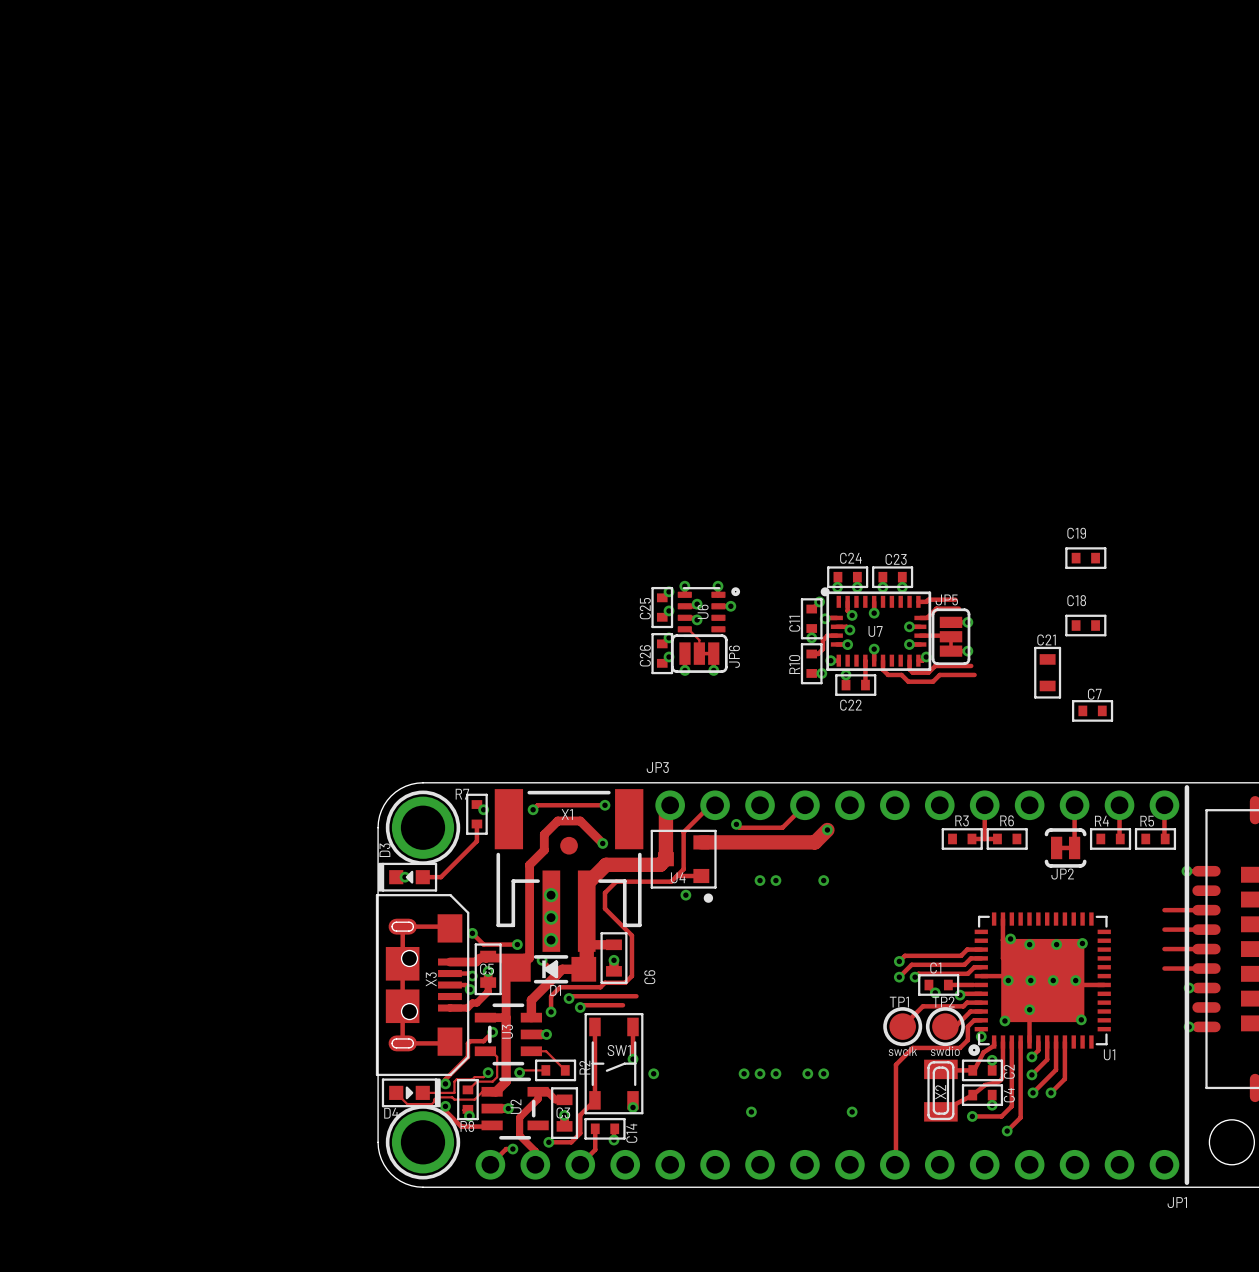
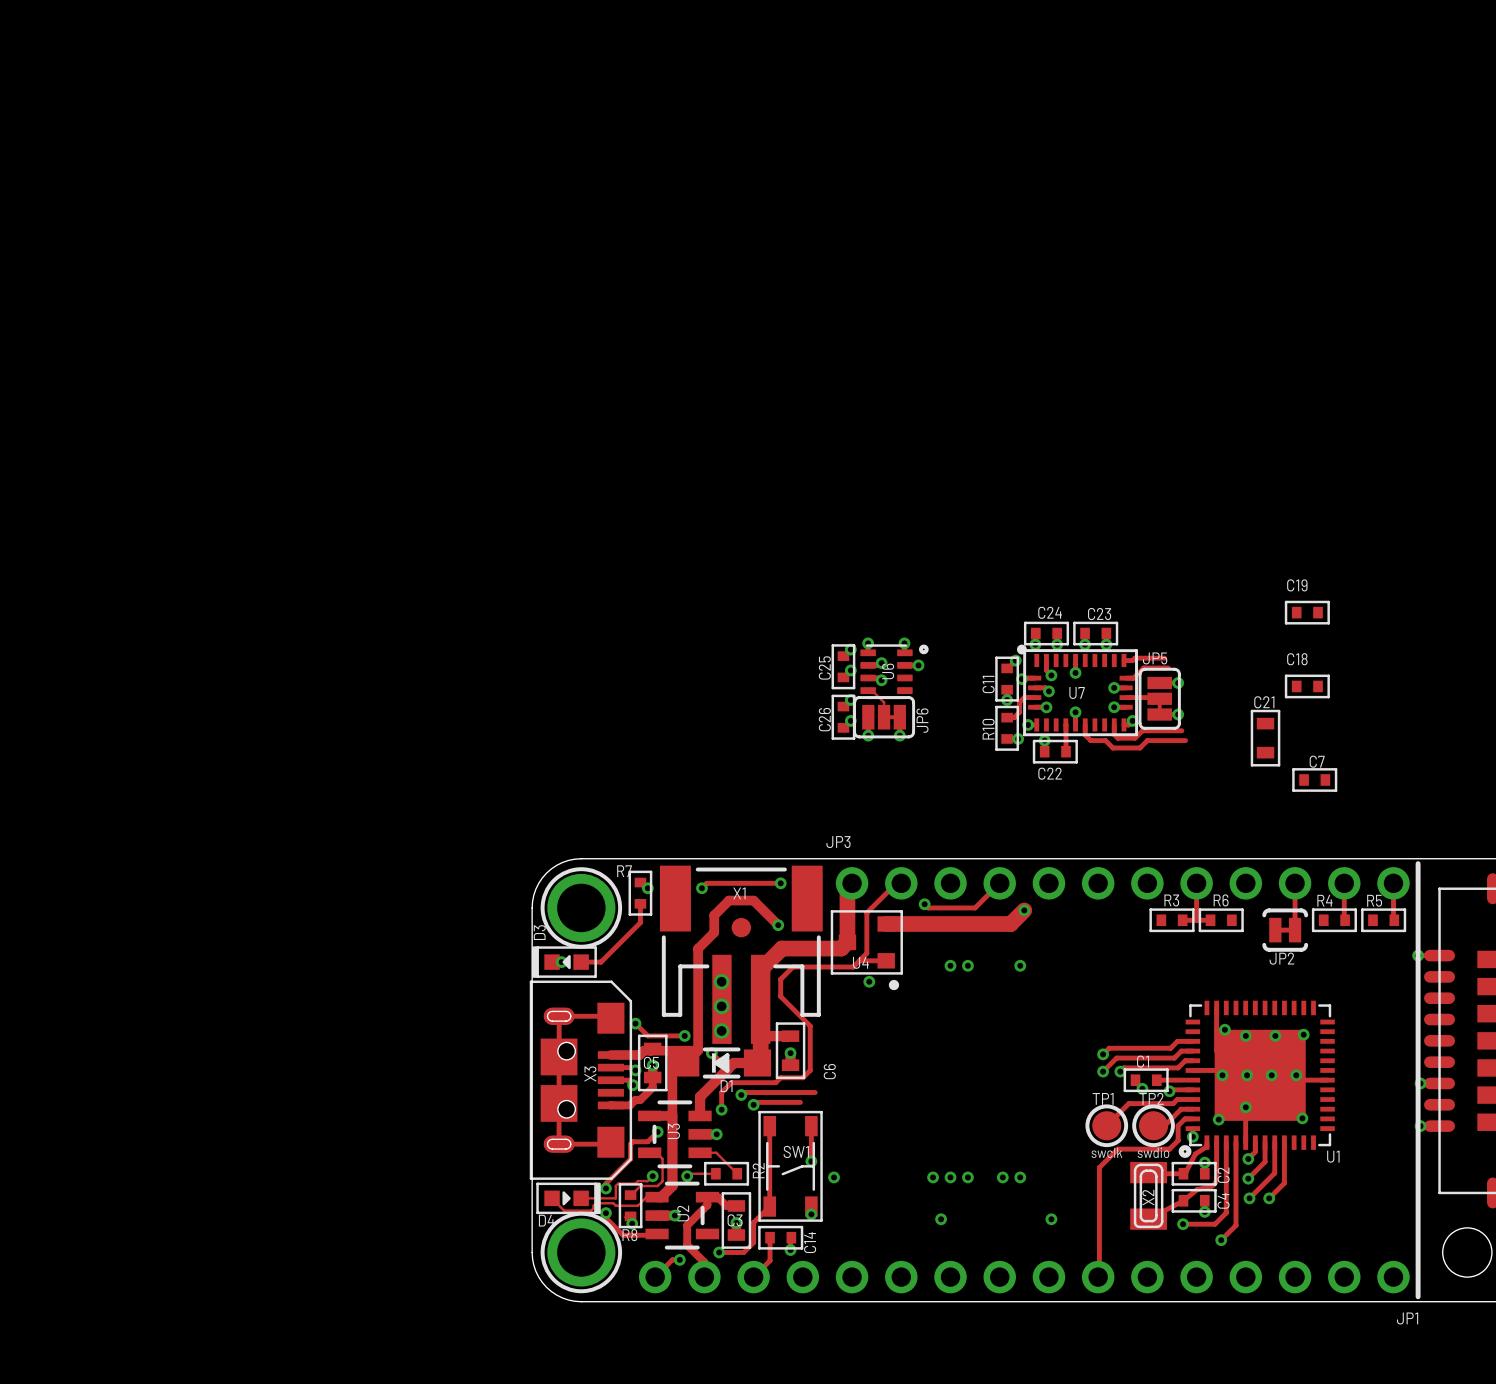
track: (1164, 910) (1206, 910) -> none
track: (1164, 929) (1206, 929) -> none
track: (1164, 949) (1206, 949) -> none
track: (1164, 968) (1206, 968) -> none

